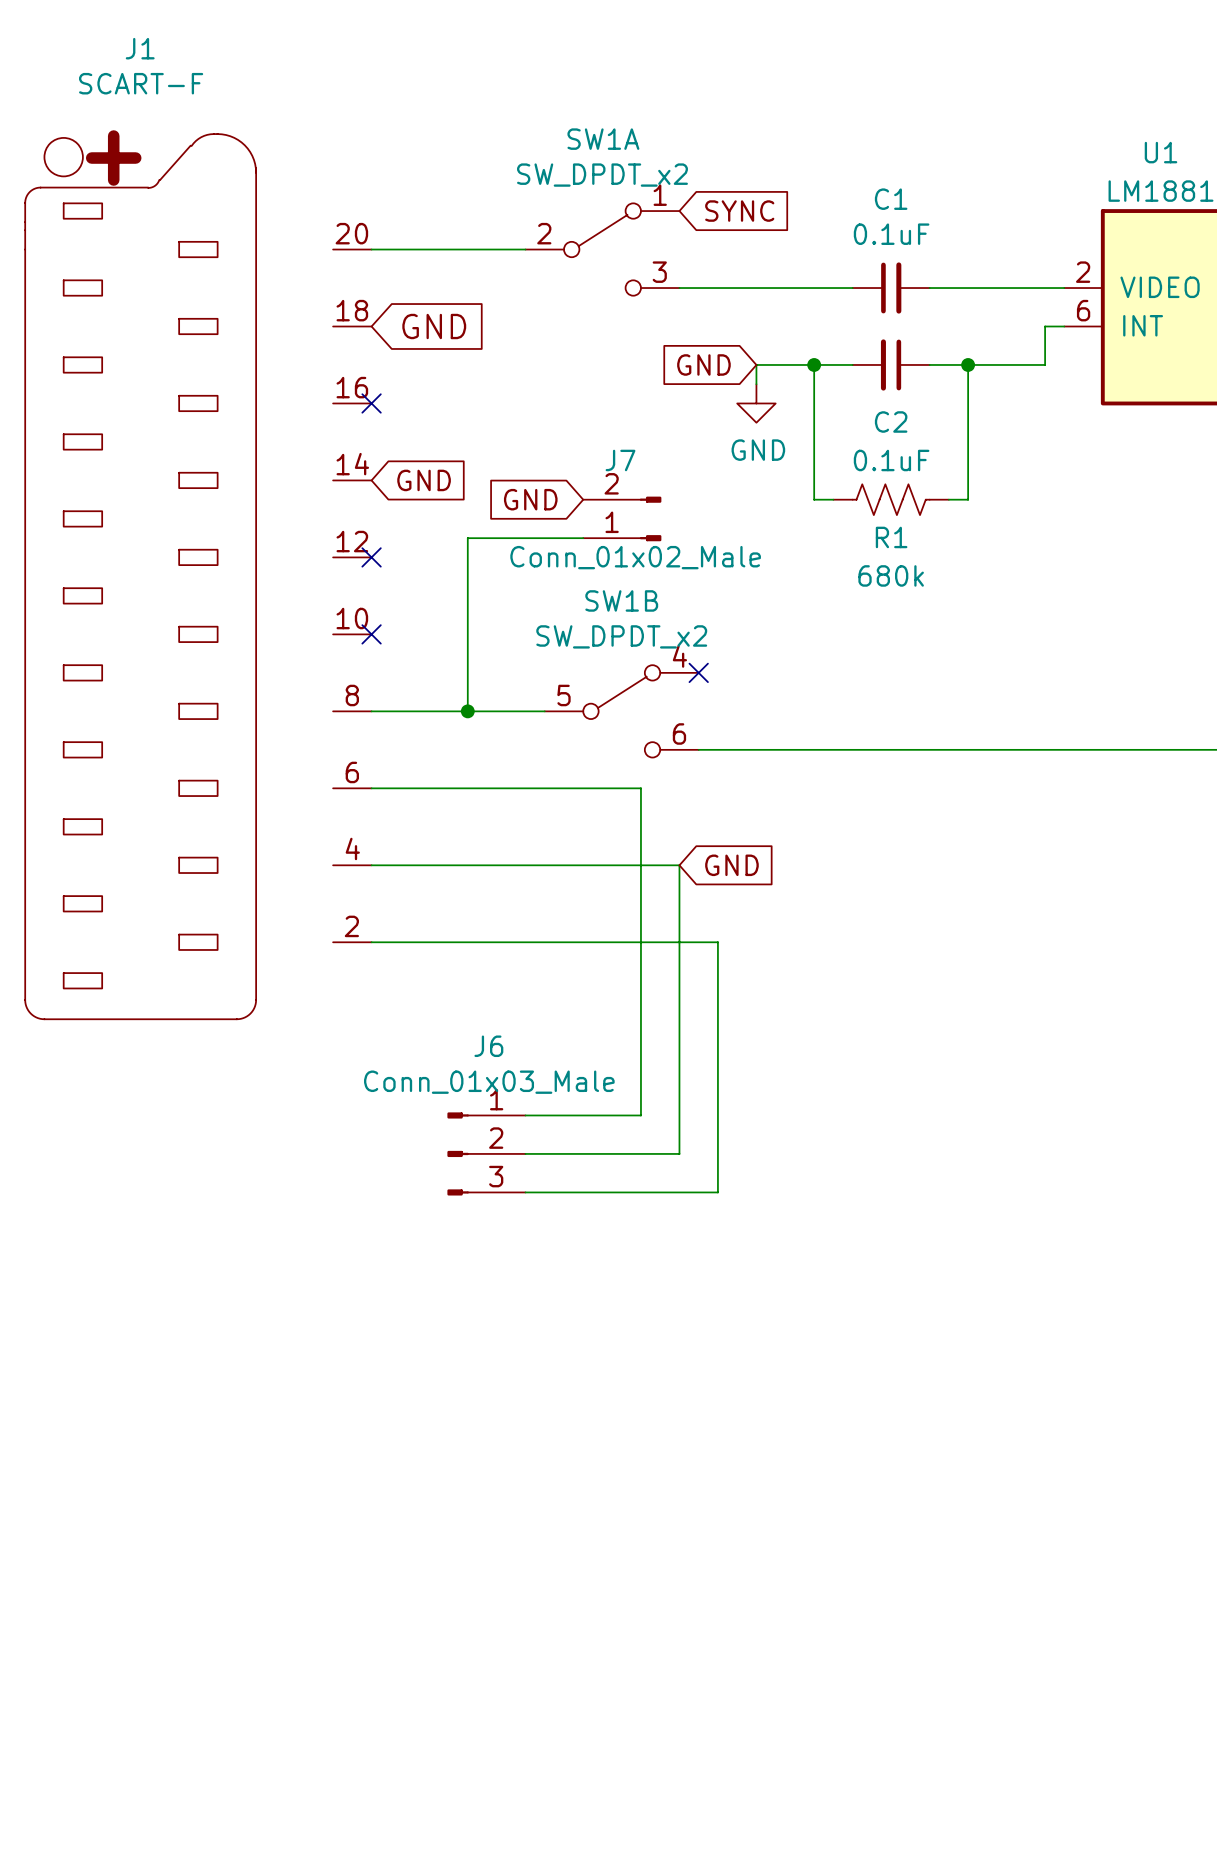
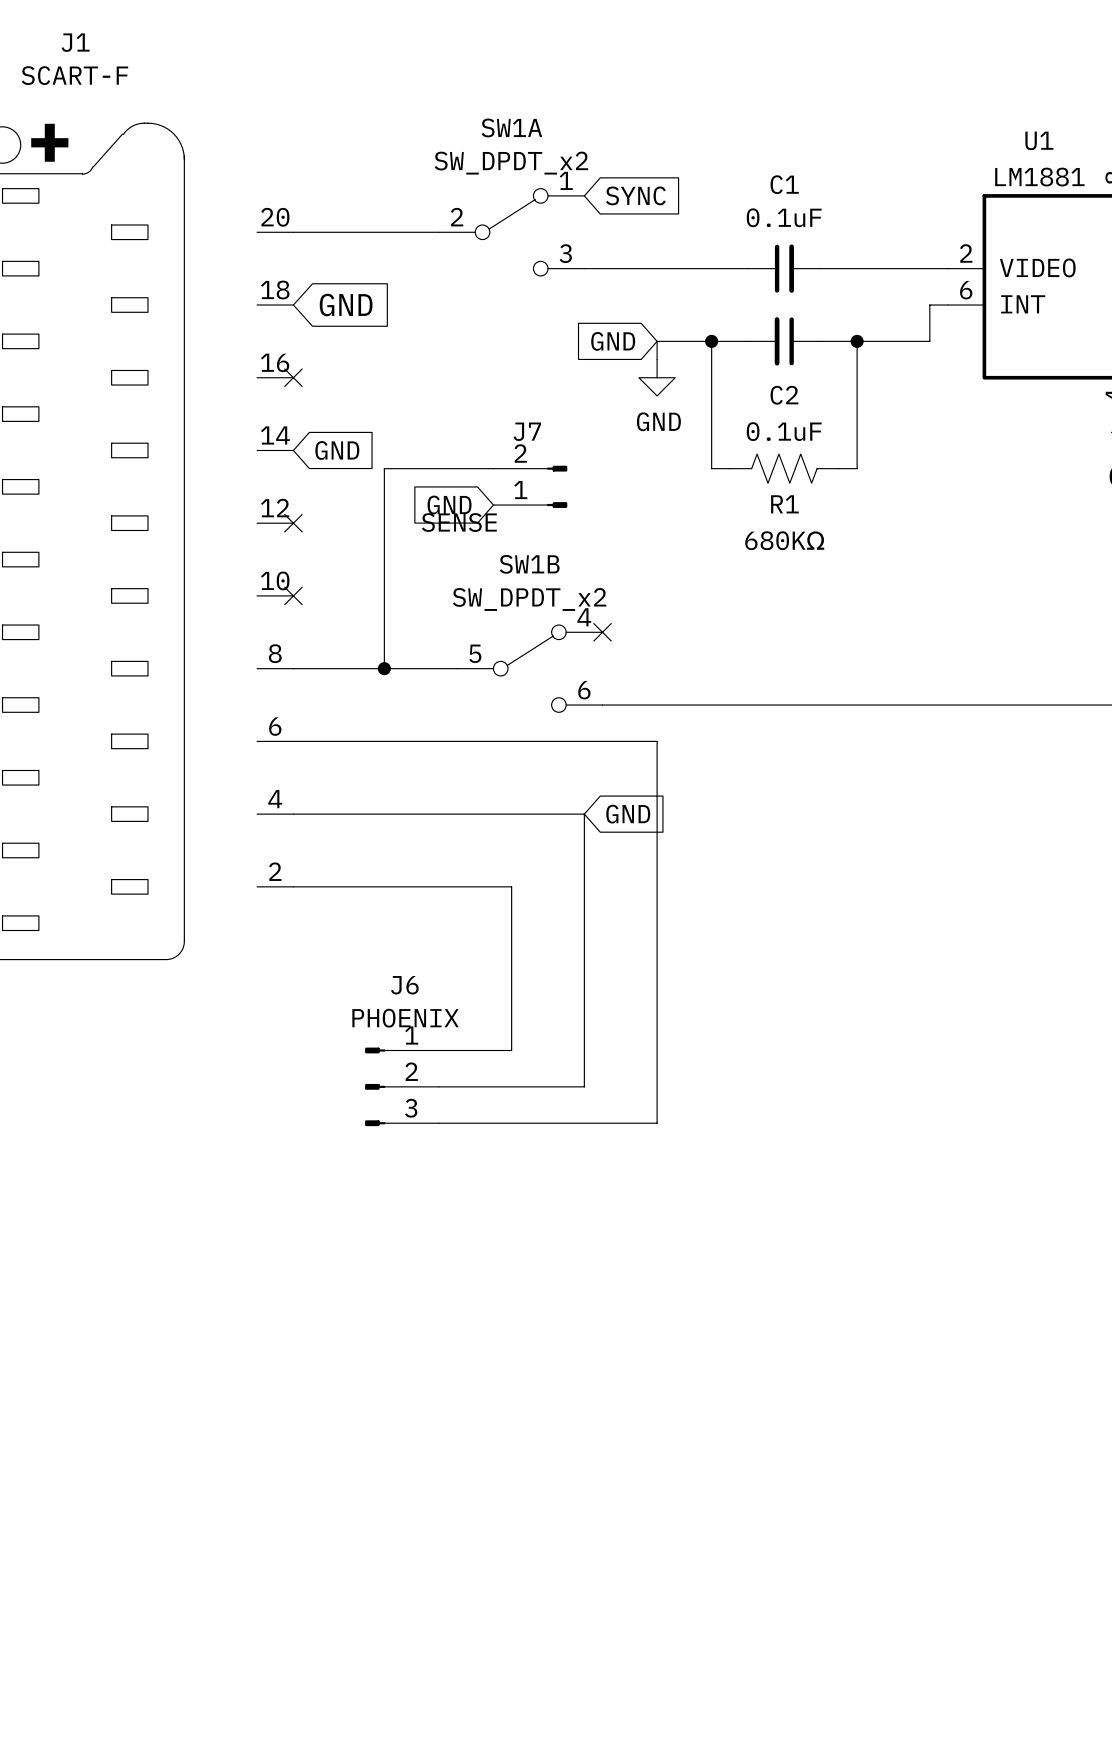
global label position: GND (530, 499) -> GND (449, 505)
wire: (467, 538) (583, 538) -> (384, 505) (384, 468) (493, 468)
J7 value: Conn_01x02_Male (635, 557) -> SENSE (459, 522)
R1 value: 680k (891, 575) -> 680KΩ (784, 540)
wire: (640, 788) (640, 1115) (602, 1115) -> (548, 741) (657, 741) (657, 1123) (620, 1123)
wire: (602, 942) (717, 942) (717, 1192) -> (511, 886) (511, 1050)
J6 value: Conn_01x03_Male (489, 1082) -> PHOENIX (405, 1018)

